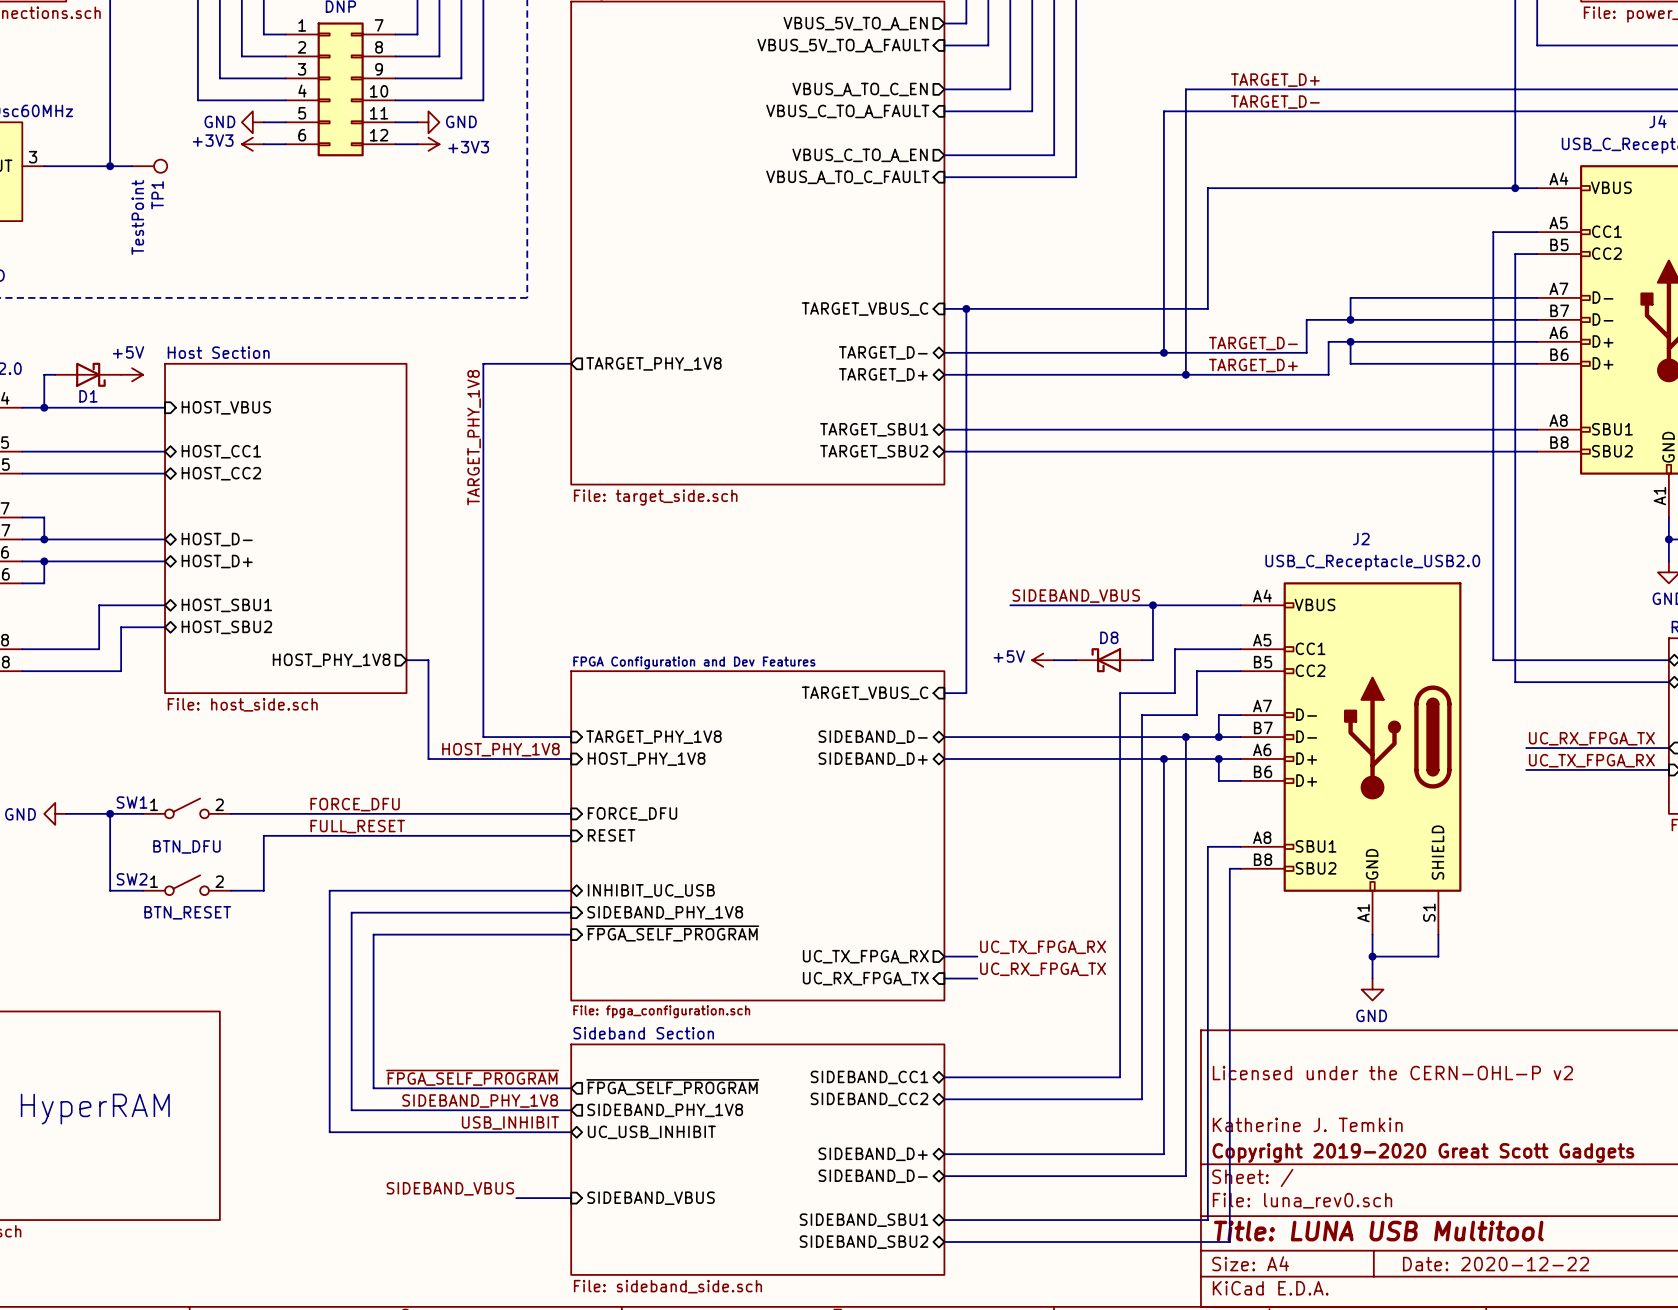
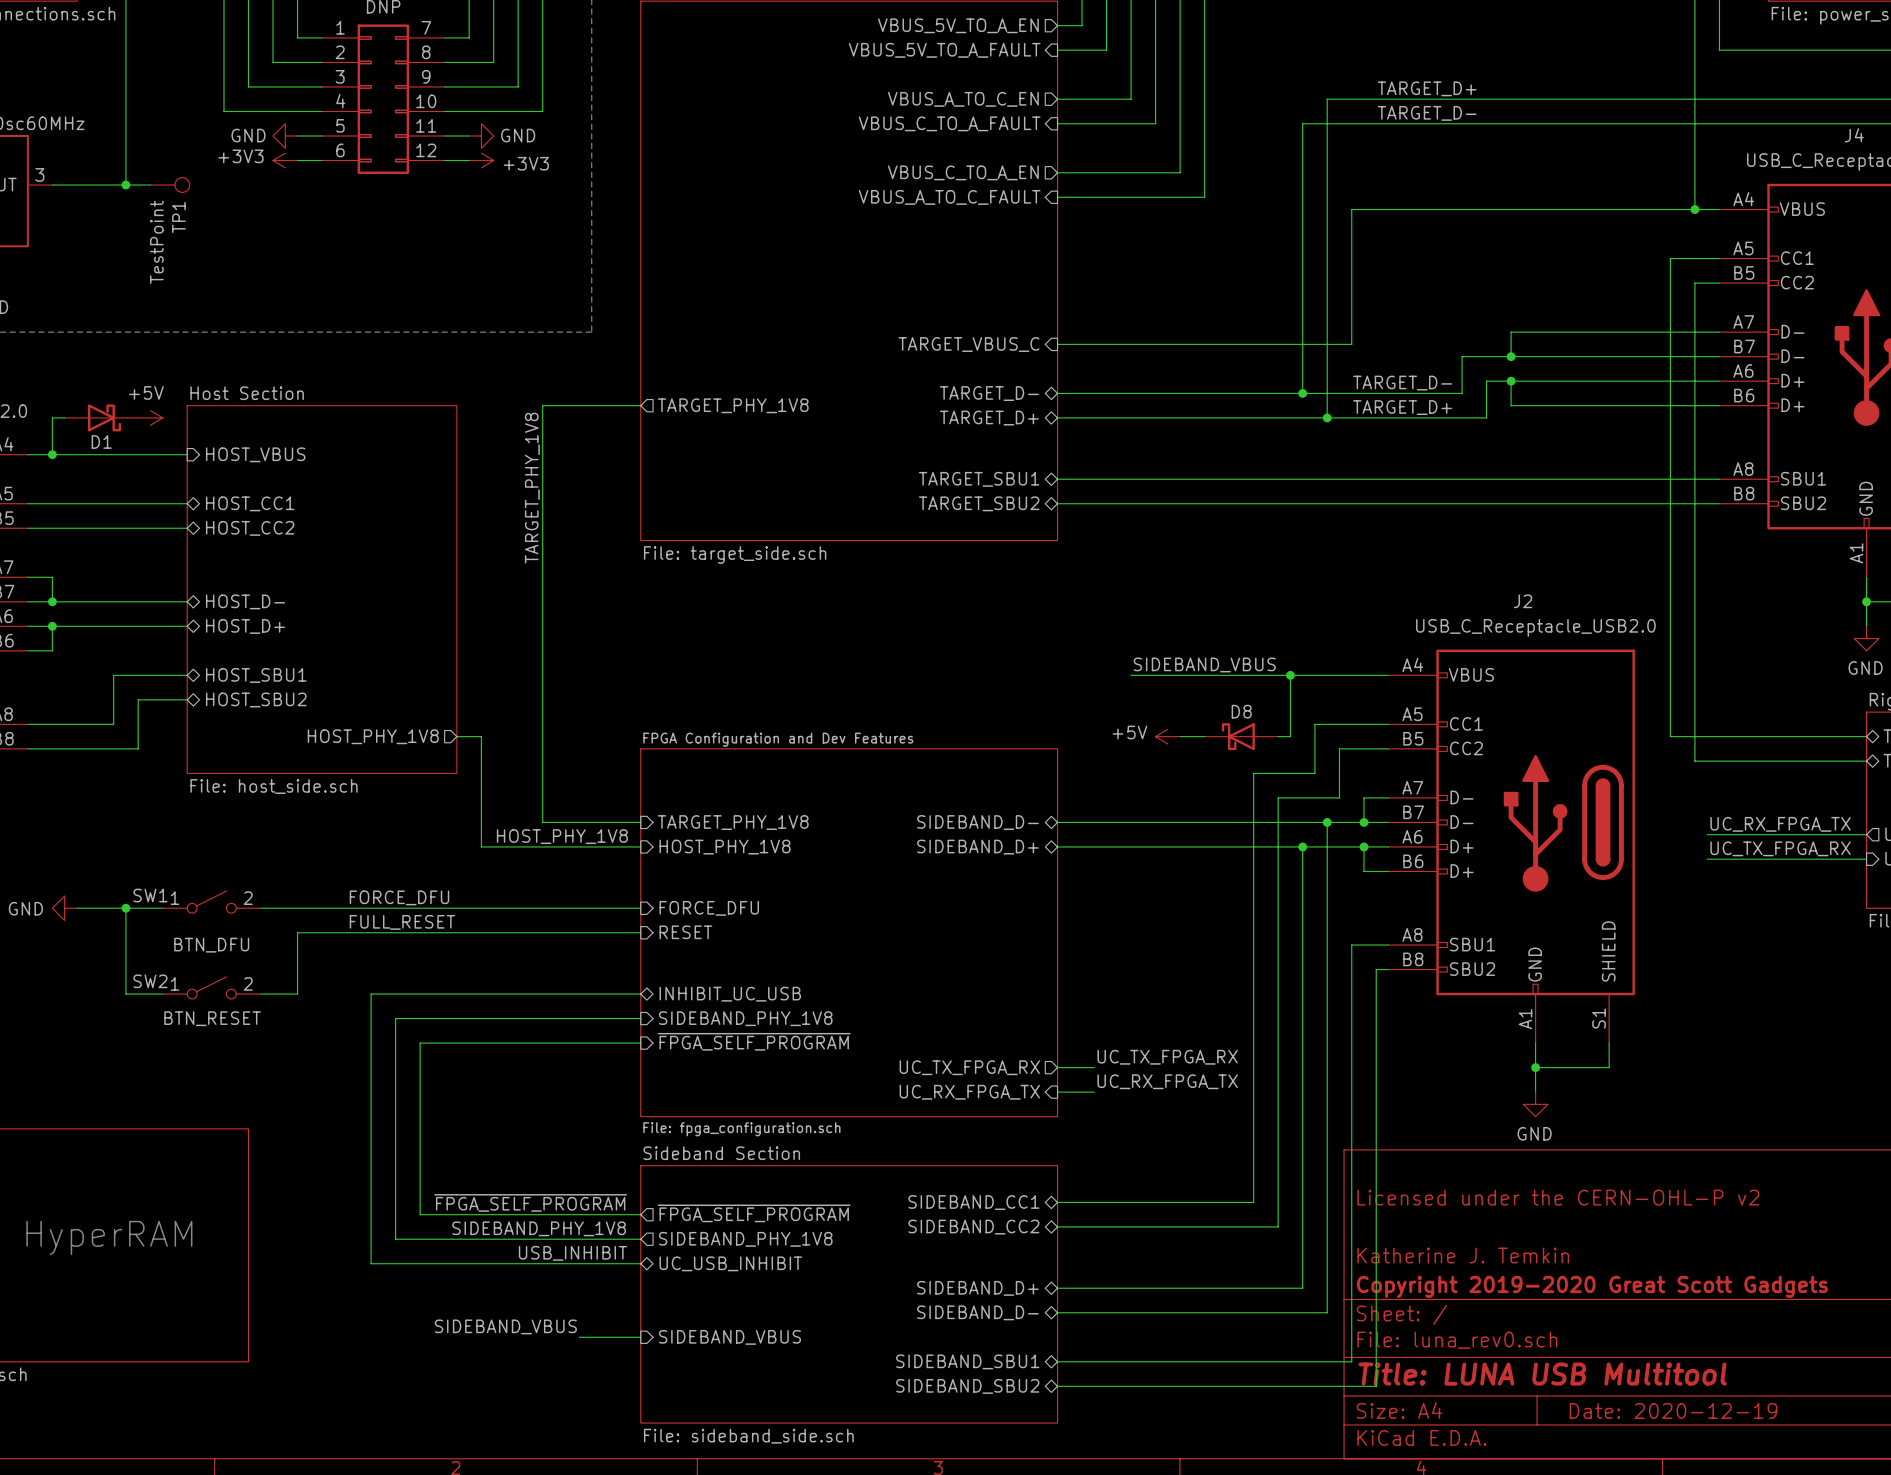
wire: (966, 308) (966, 693) (944, 693) -> none
junction: (966, 308) -> none
sheet pin: TARGET_VBUS_C (865, 693) -> none
title block: Date: 2020-12-22 (1496, 1264) -> Date: 2020-12-19 (1673, 1410)

